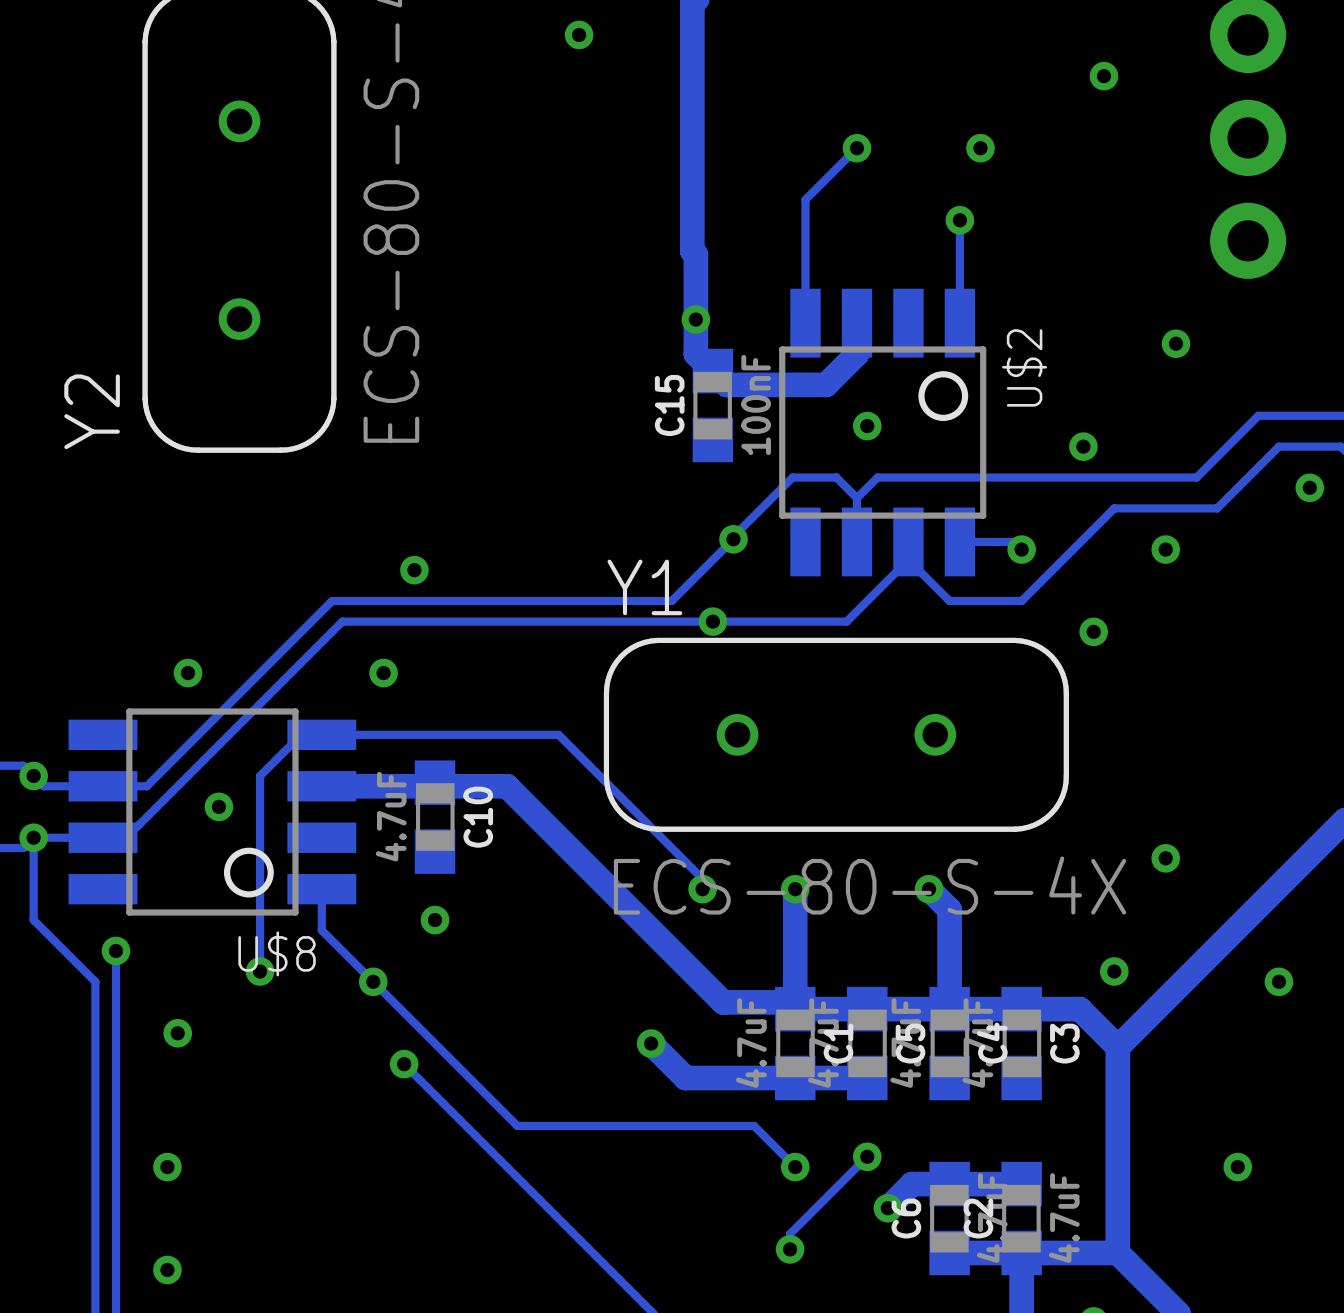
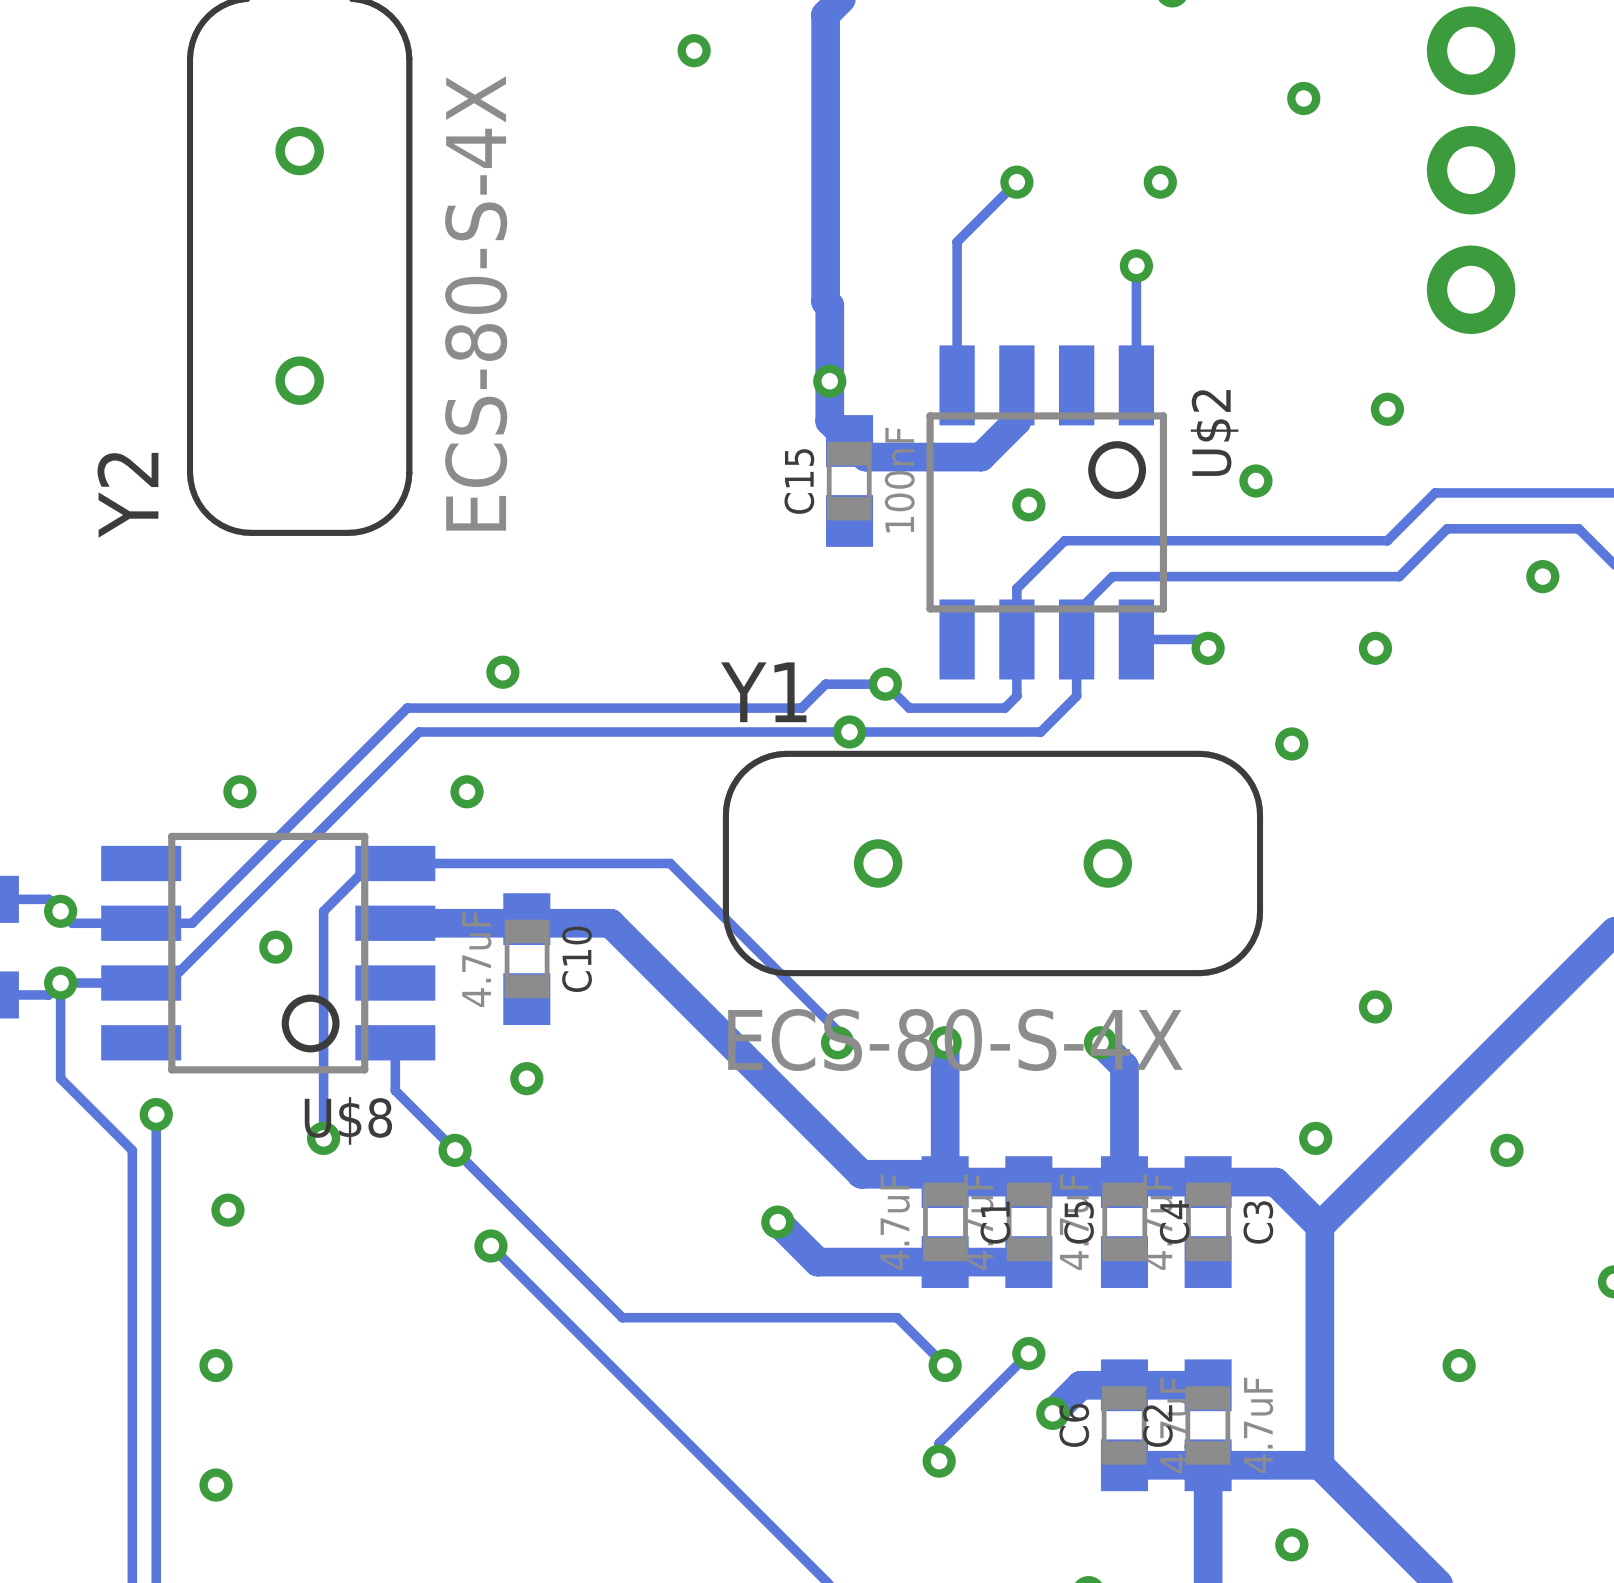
track: (1258, 415) (1227, 446) -> (1506, 528) (1447, 528)
track: none -> (1483, 492) (1435, 492) (1387, 540) (1064, 540) (1040, 564)
via position: (1083, 446) -> (1255, 480)
track: (1278, 446) (1217, 508) (1114, 508) (1021, 601) (949, 601) (908, 559) (846, 621) -> (1076, 660) (1076, 696) (1040, 732) (1004, 732)
track: (1196, 477) (877, 477) -> (1411, 564) (1399, 576) (1112, 576) (1076, 612) (1076, 639)
track: (856, 498) (836, 477) (792, 477) (692, 580) -> (1016, 639) (1016, 696) (1004, 708) (909, 708) (885, 684) (825, 684)
via position: (733, 539) -> (885, 684)

